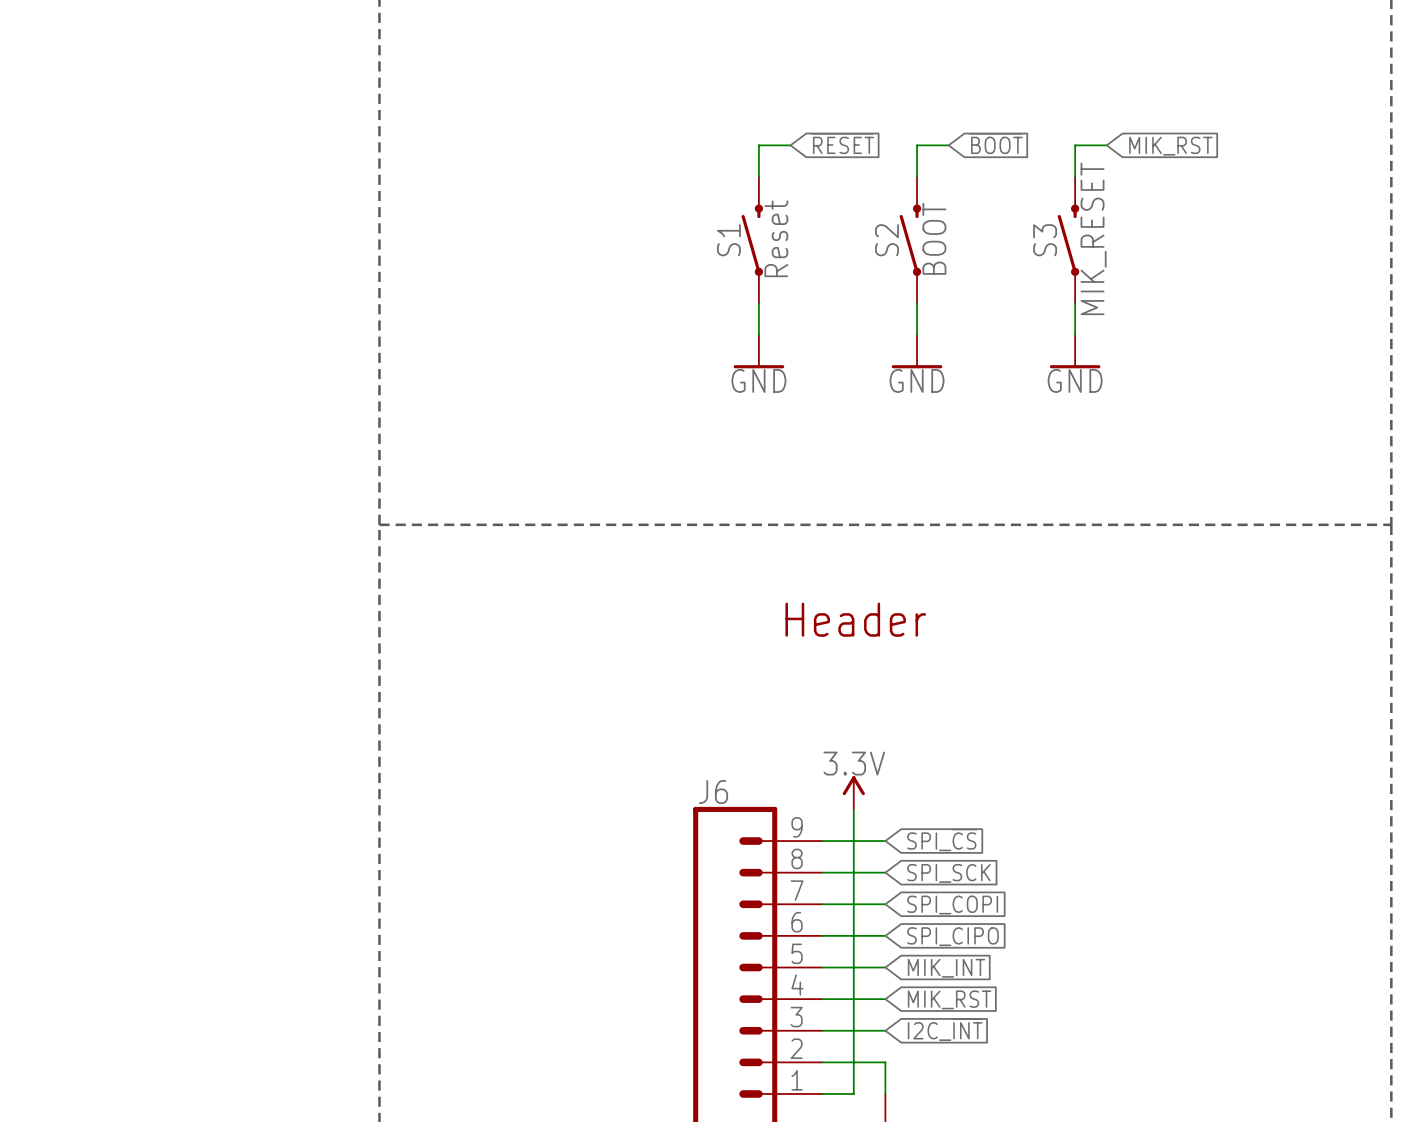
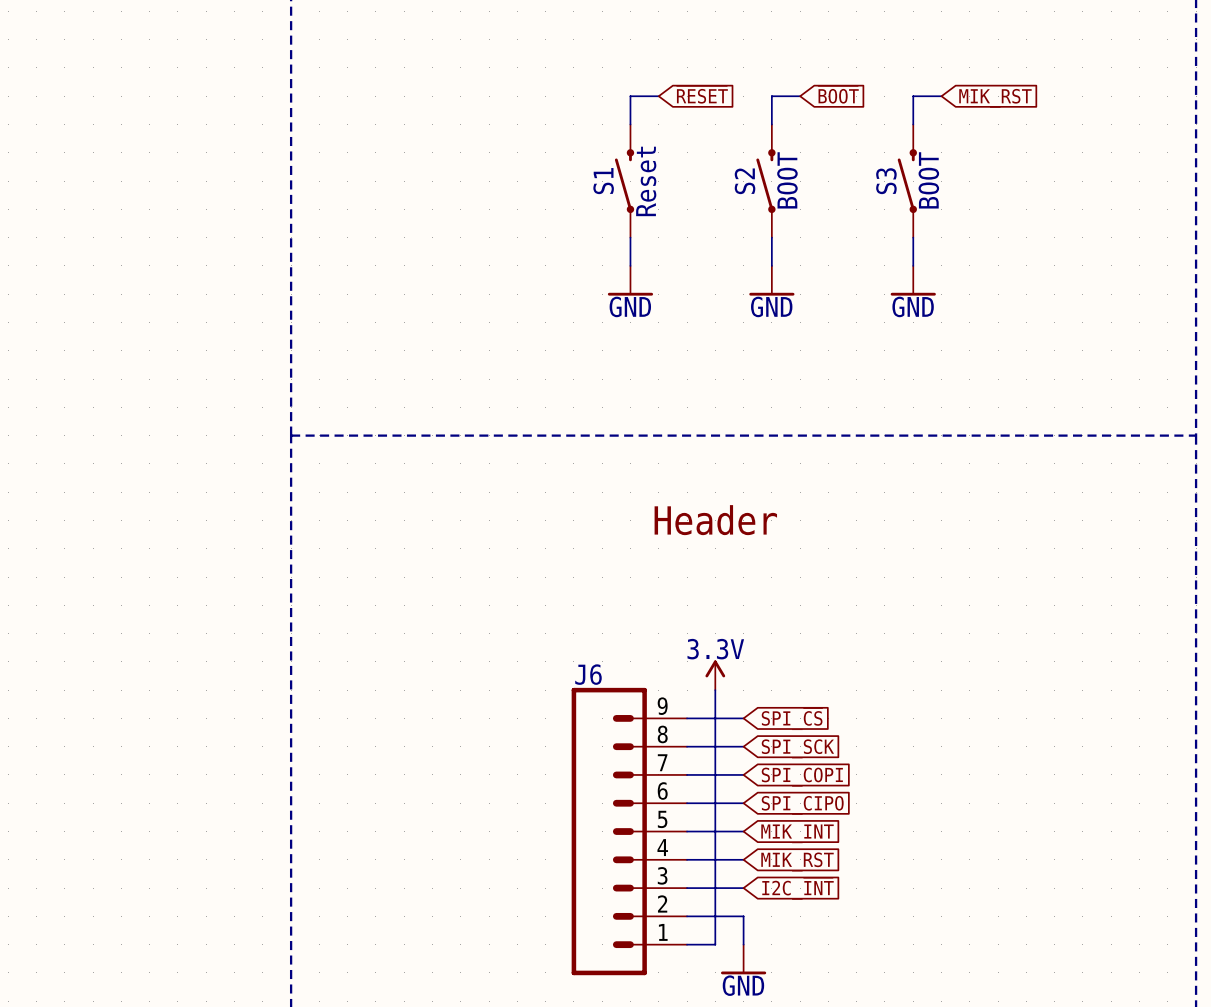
S3 value: MIK_RESET (1093, 238) -> BOOT (928, 180)

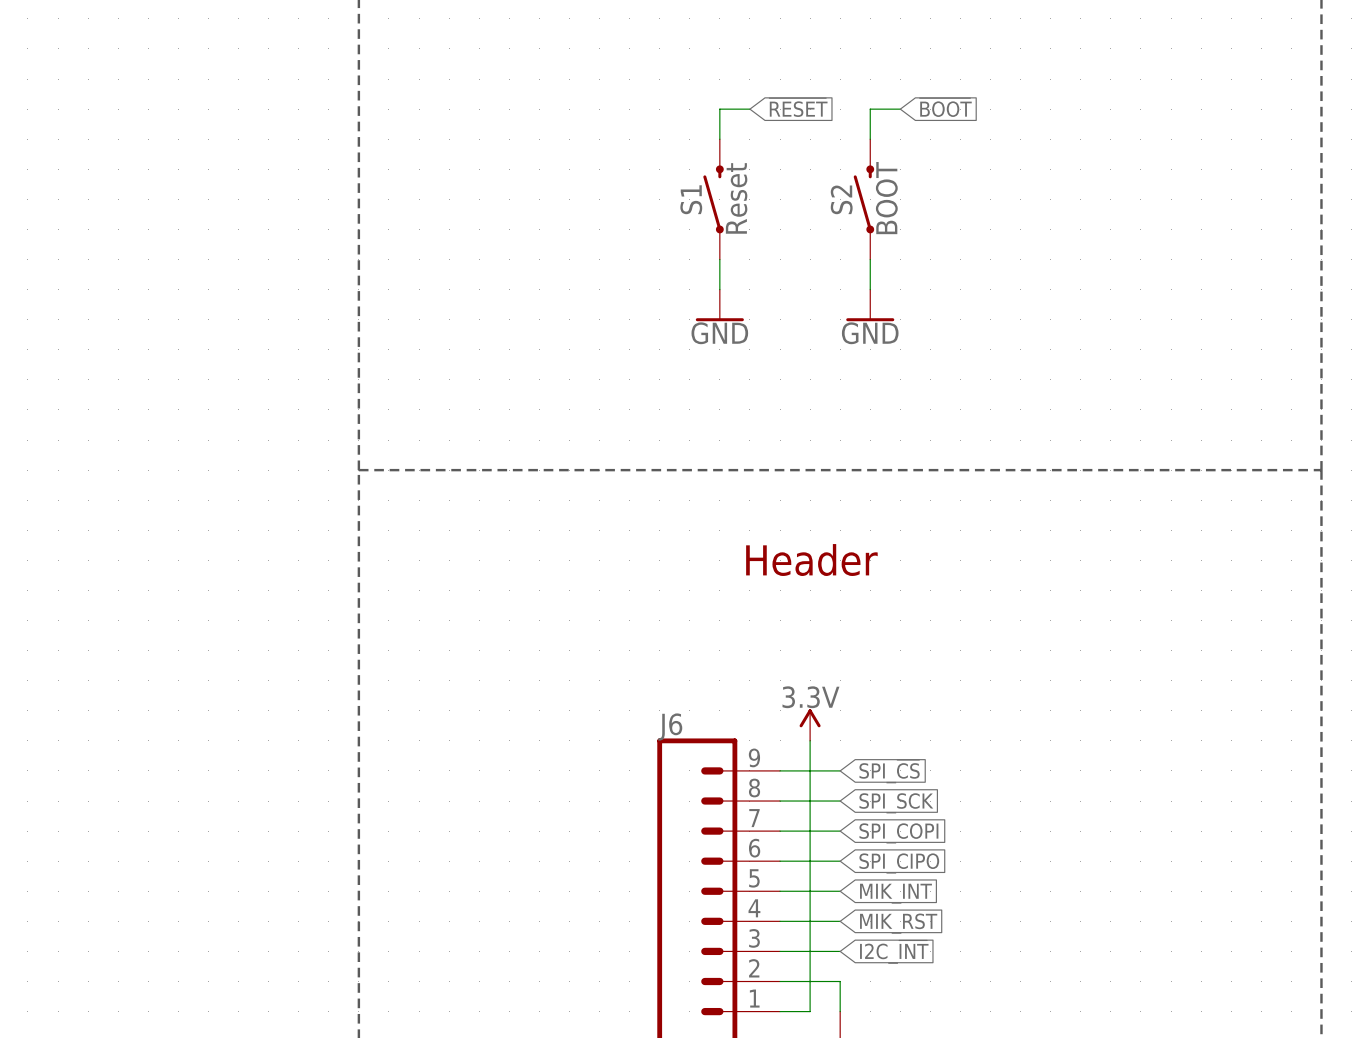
wire: (941, 96) (913, 96) (913, 124) -> none
global label: MIK_RST (995, 98) -> none
S3: BOOT (907, 181) -> none
wire: (913, 237) (913, 265) -> none
power symbol: GND (913, 280) -> none

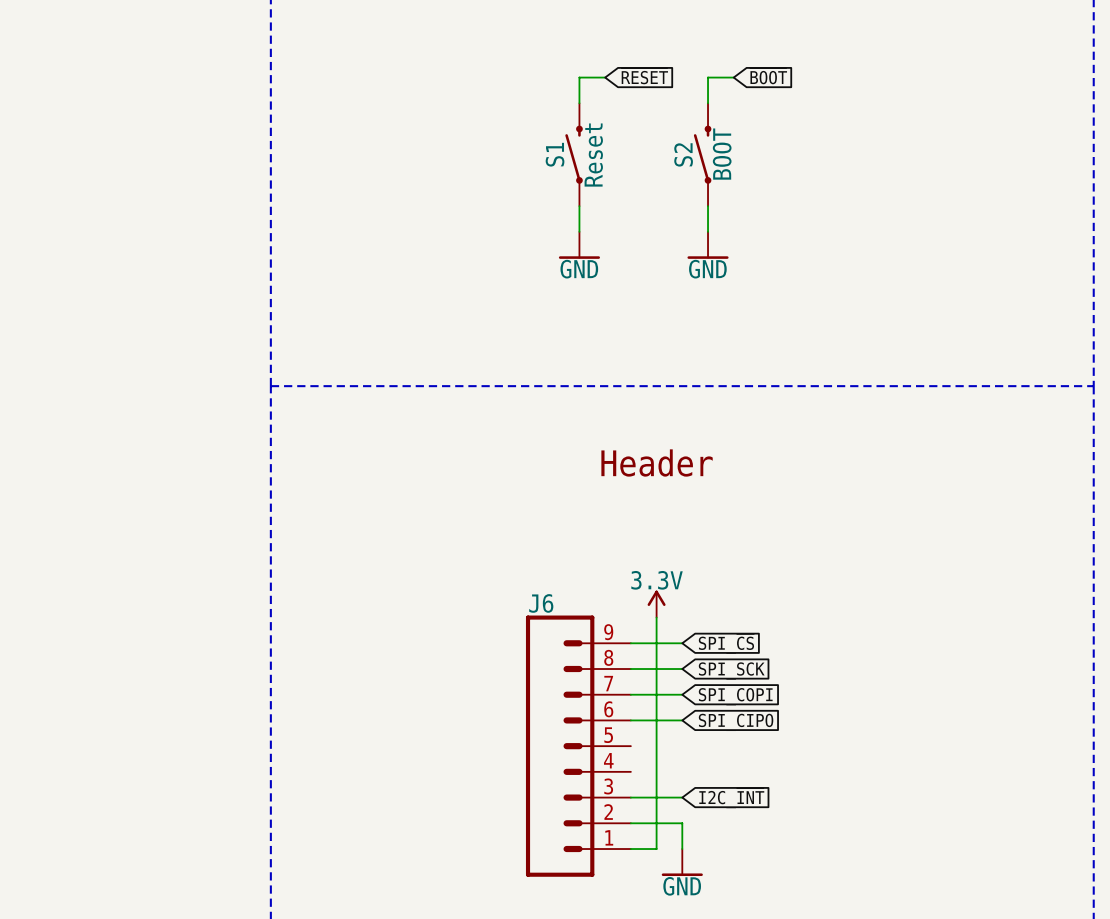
wire: (780, 891) (840, 891) -> none
global label: MIK_INT (895, 893) -> none
wire: (780, 921) (840, 921) -> none
global label: MIK_RST (898, 923) -> none

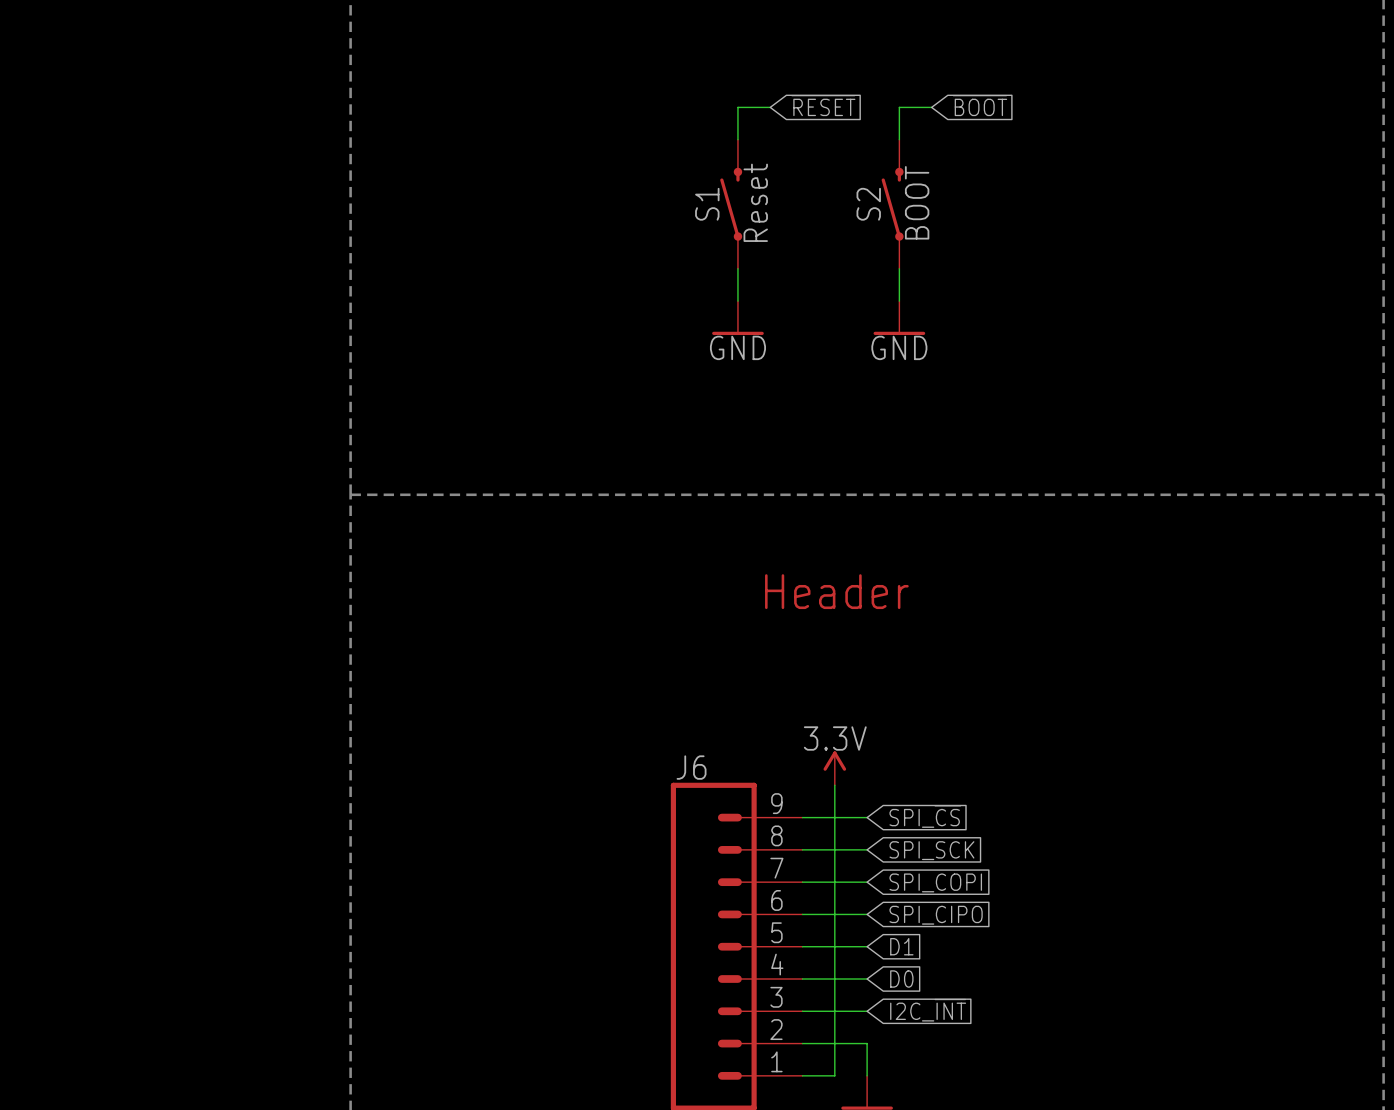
wire: none -> (802, 946) (867, 946)
global label: none -> D1 (901, 946)
wire: none -> (802, 979) (867, 979)
global label: none -> D0 (901, 979)

